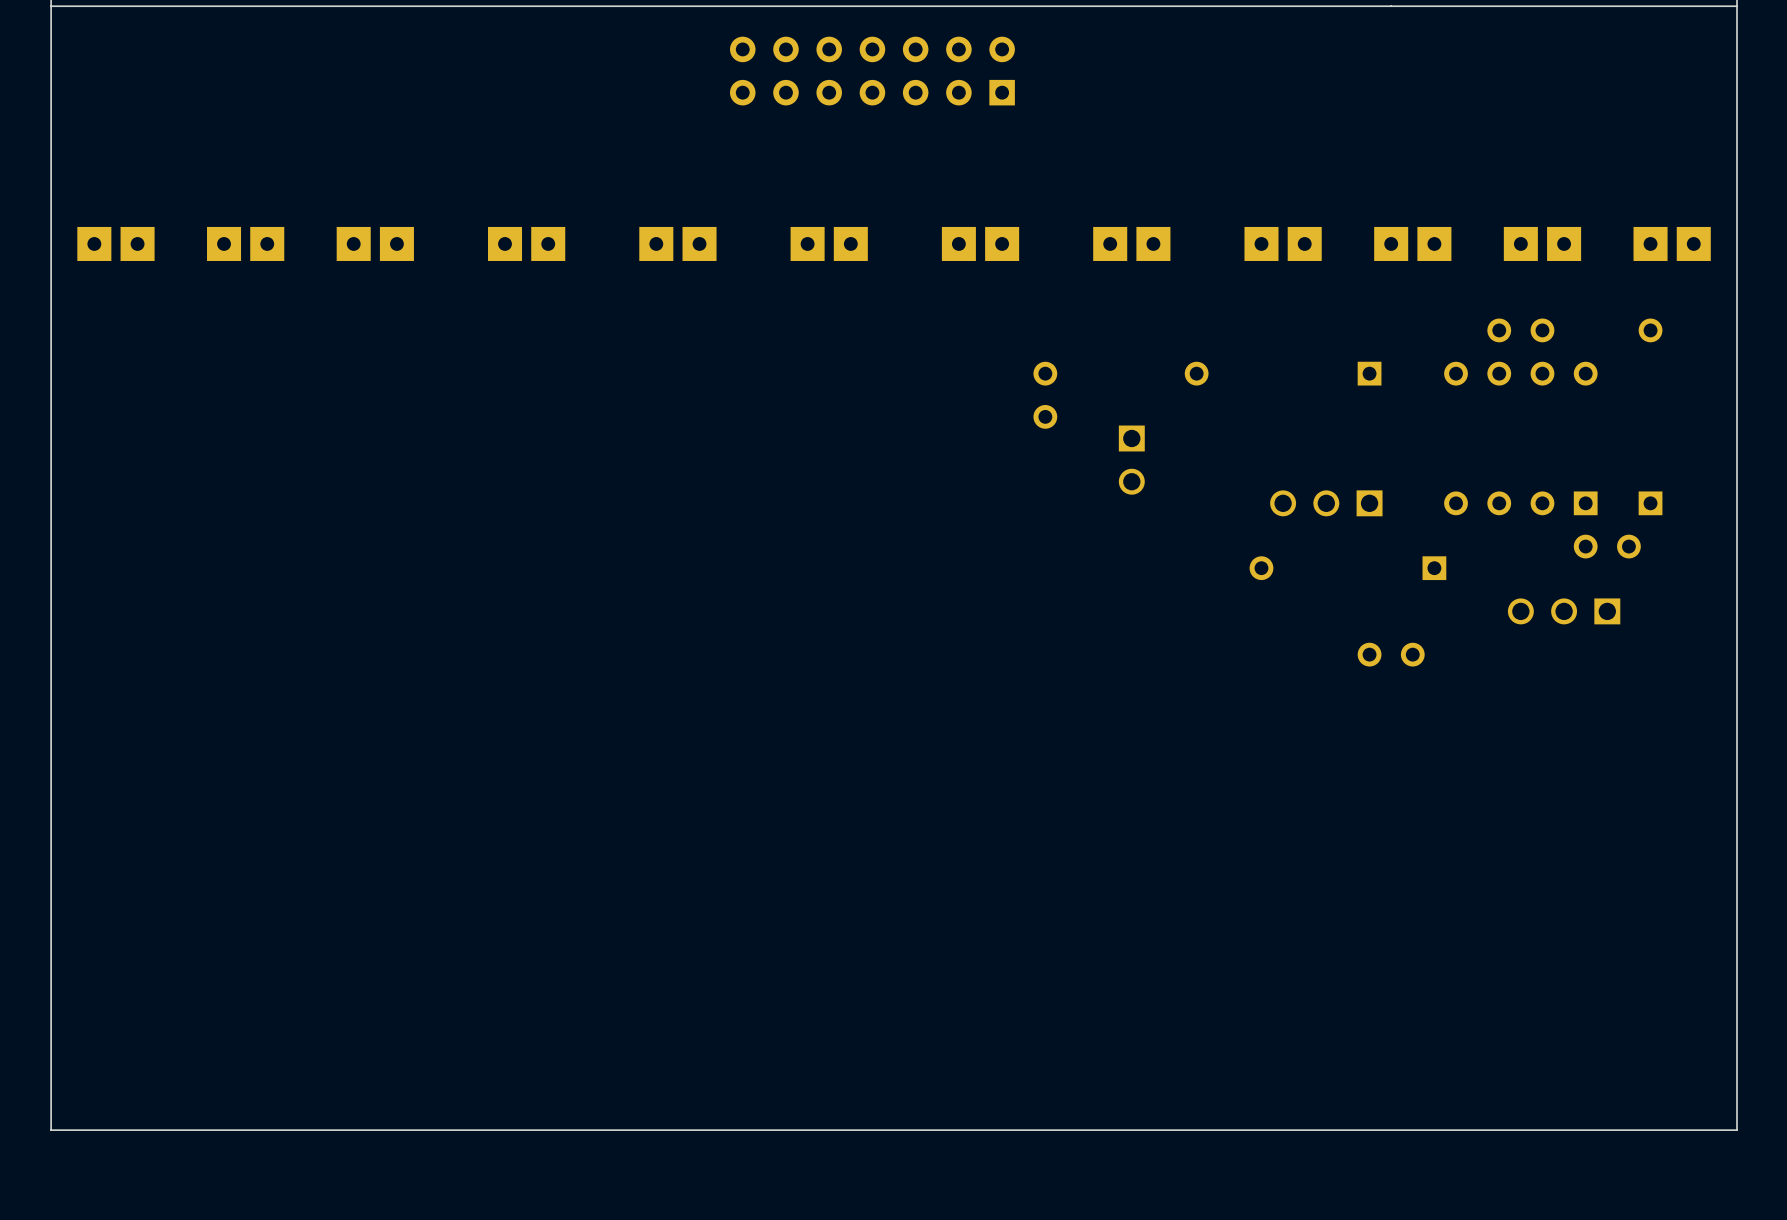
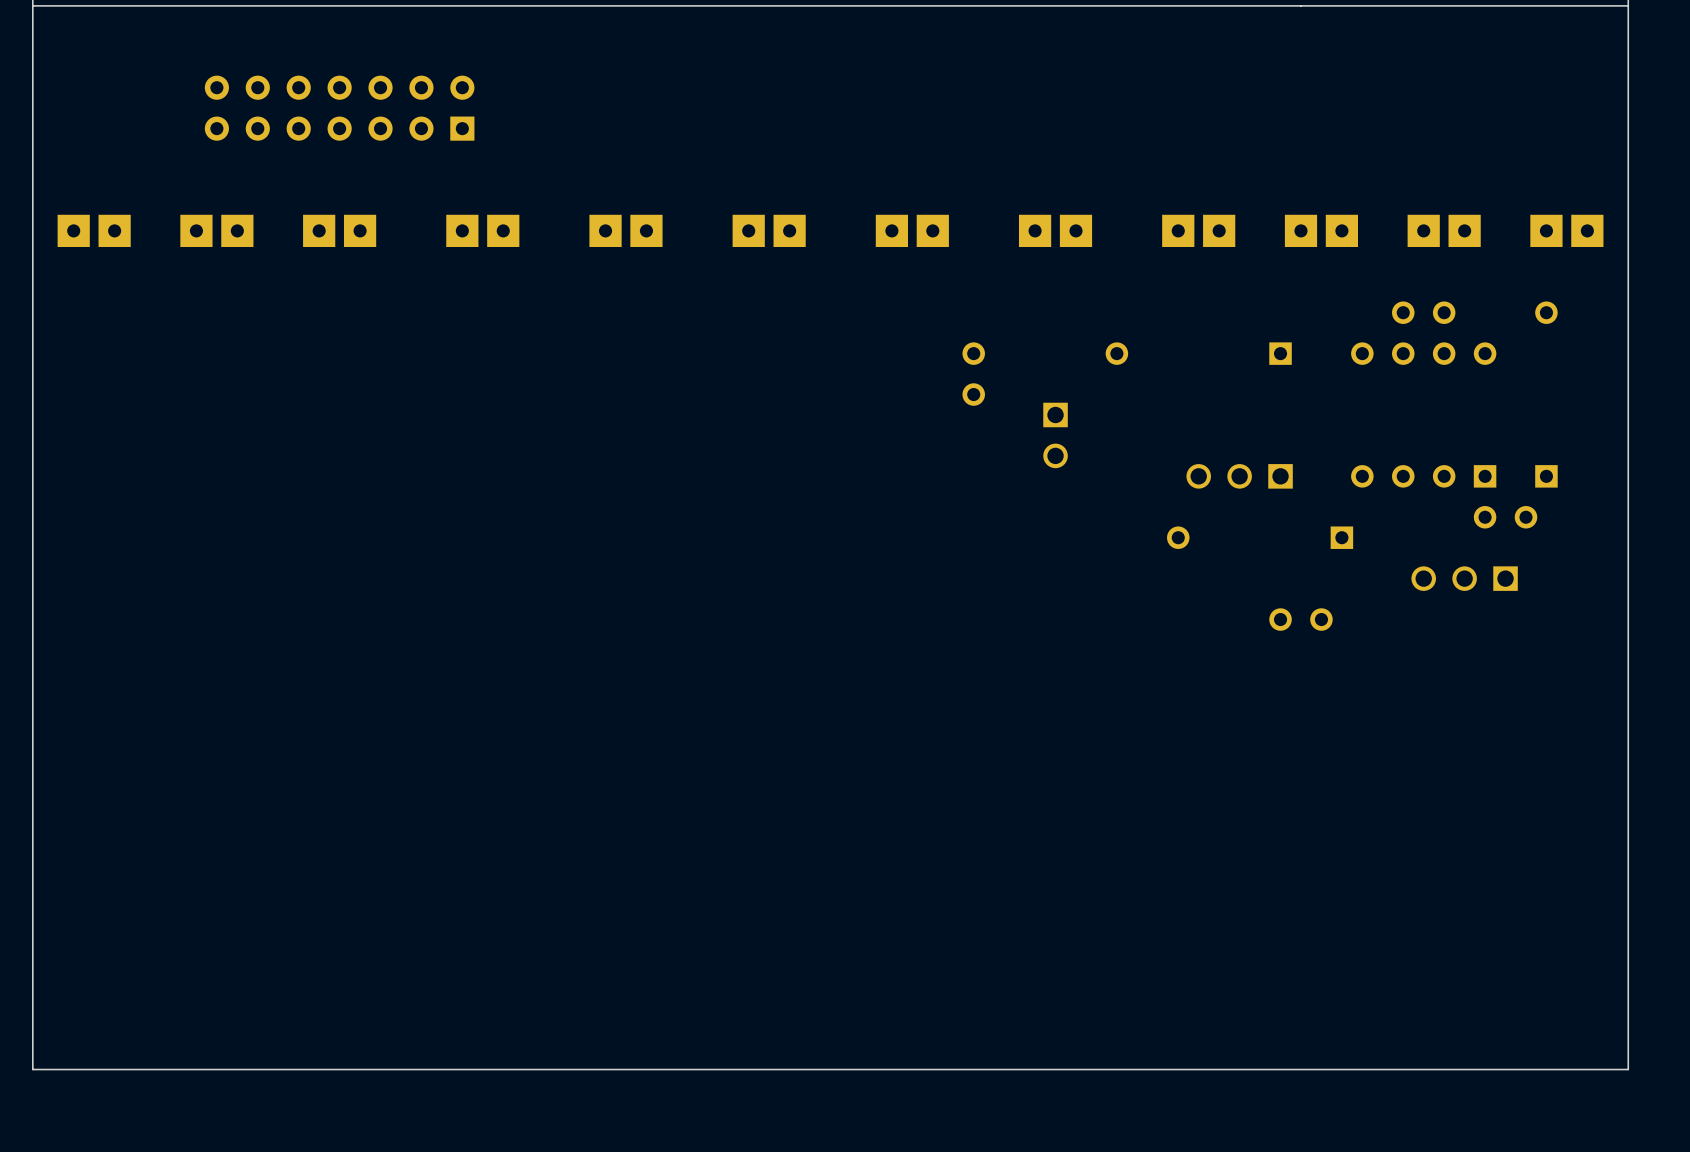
part: (872, 71) -> none
part: none -> (339, 108)

